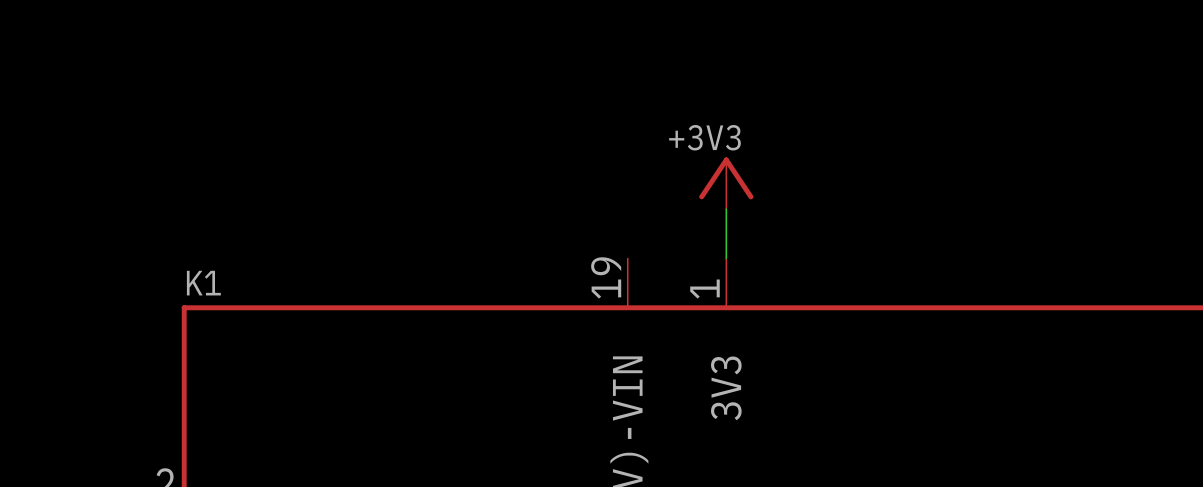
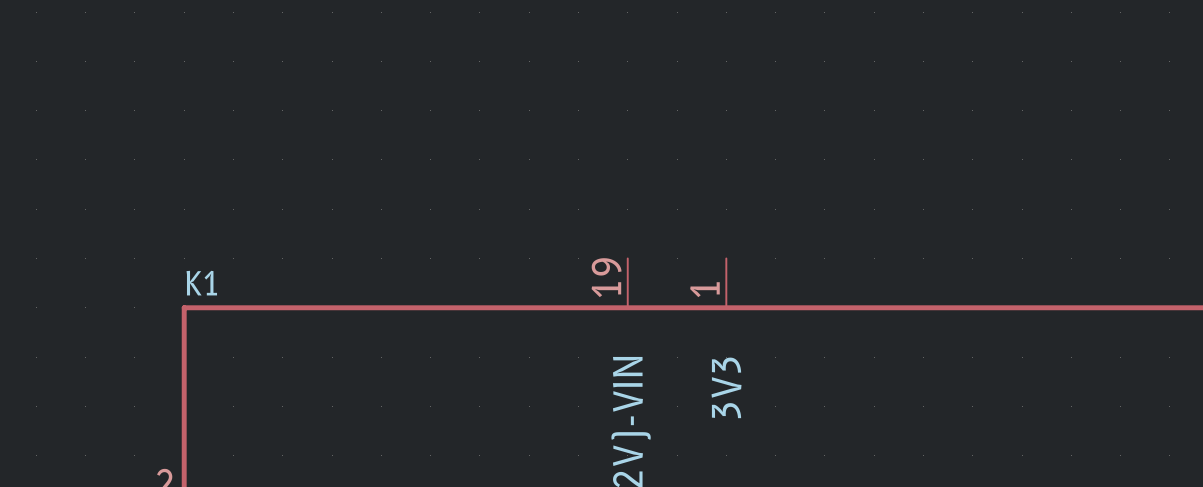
power symbol: +3V3 (726, 183) -> none
wire: (726, 209) (726, 258) -> none

